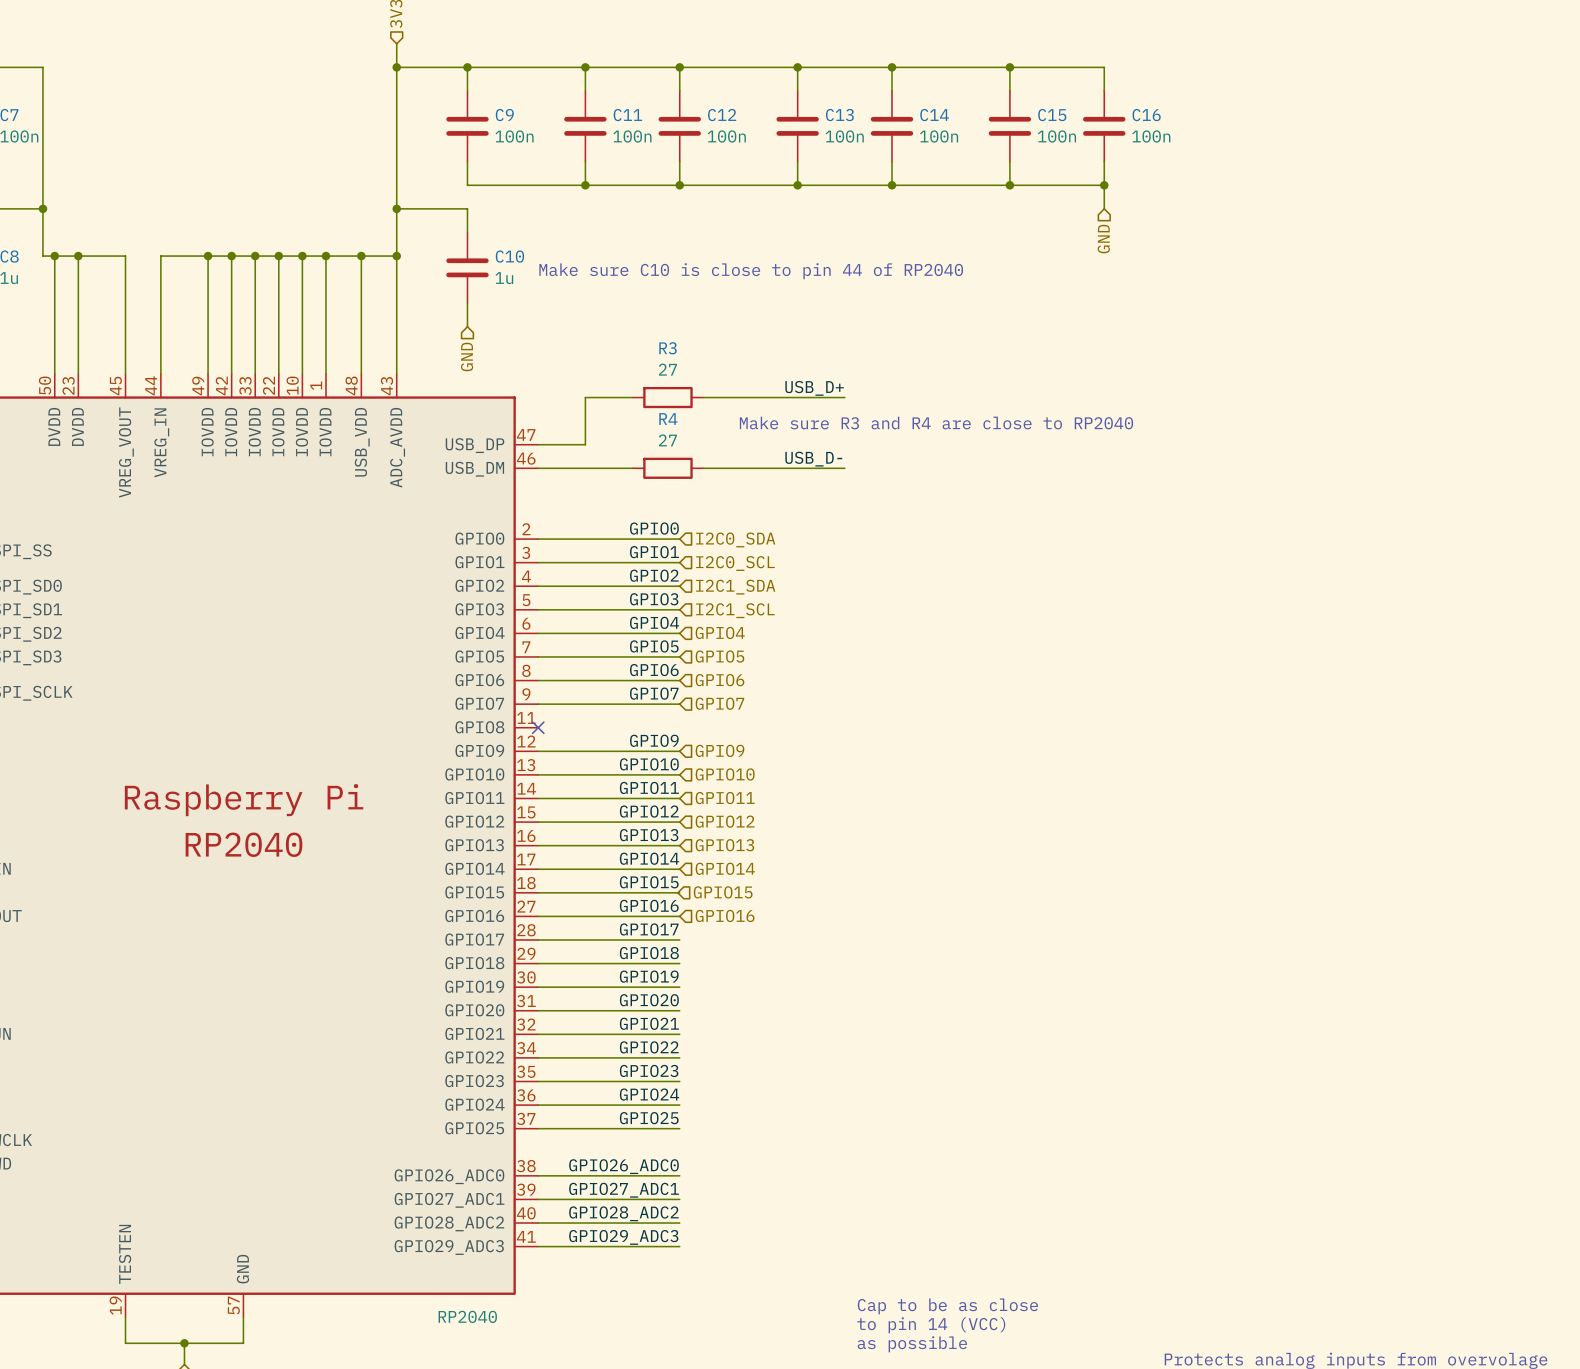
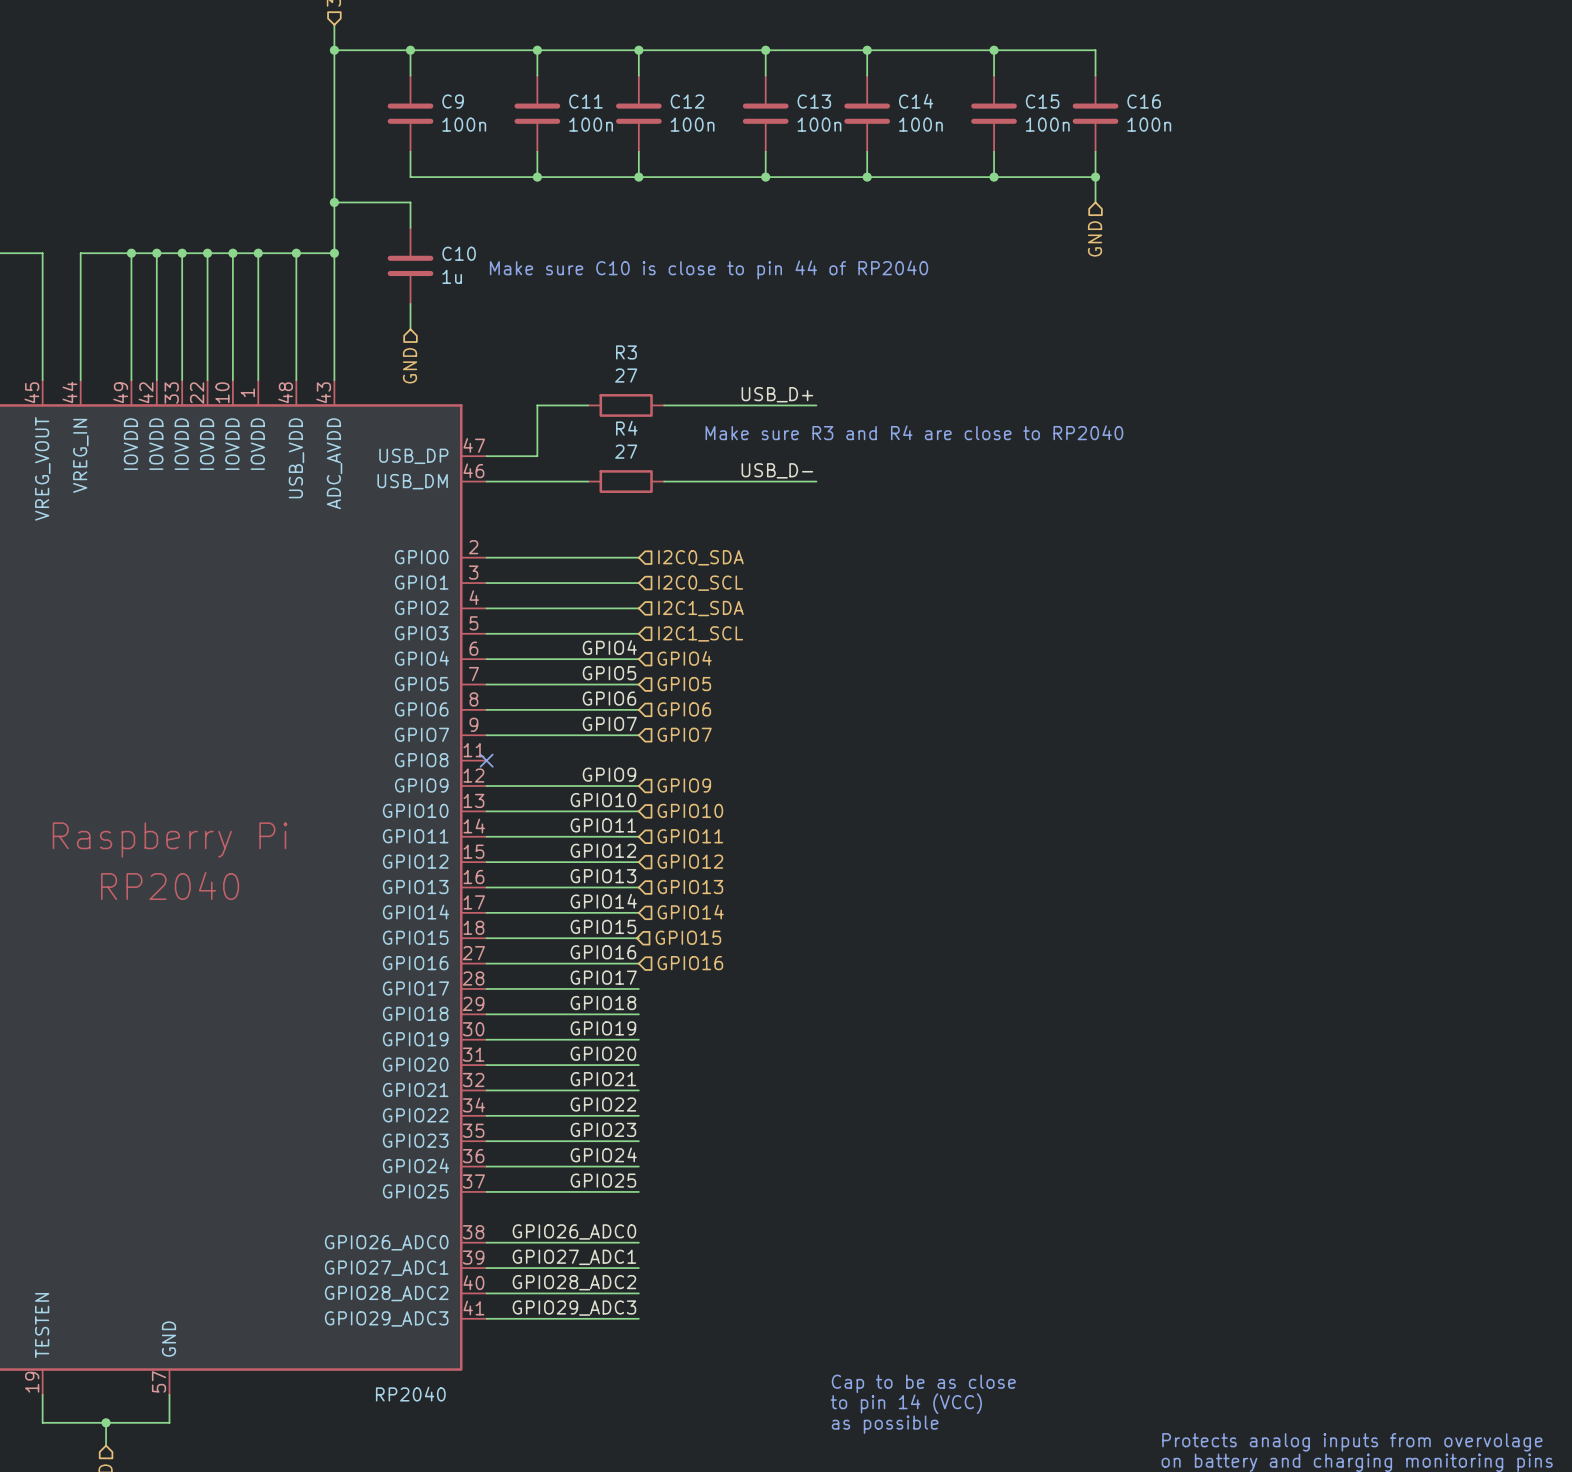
label: GPIO0 (654, 528) -> none
label: GPIO1 (654, 552) -> none
label: GPIO2 (654, 575) -> none
label: GPIO3 (654, 599) -> none

